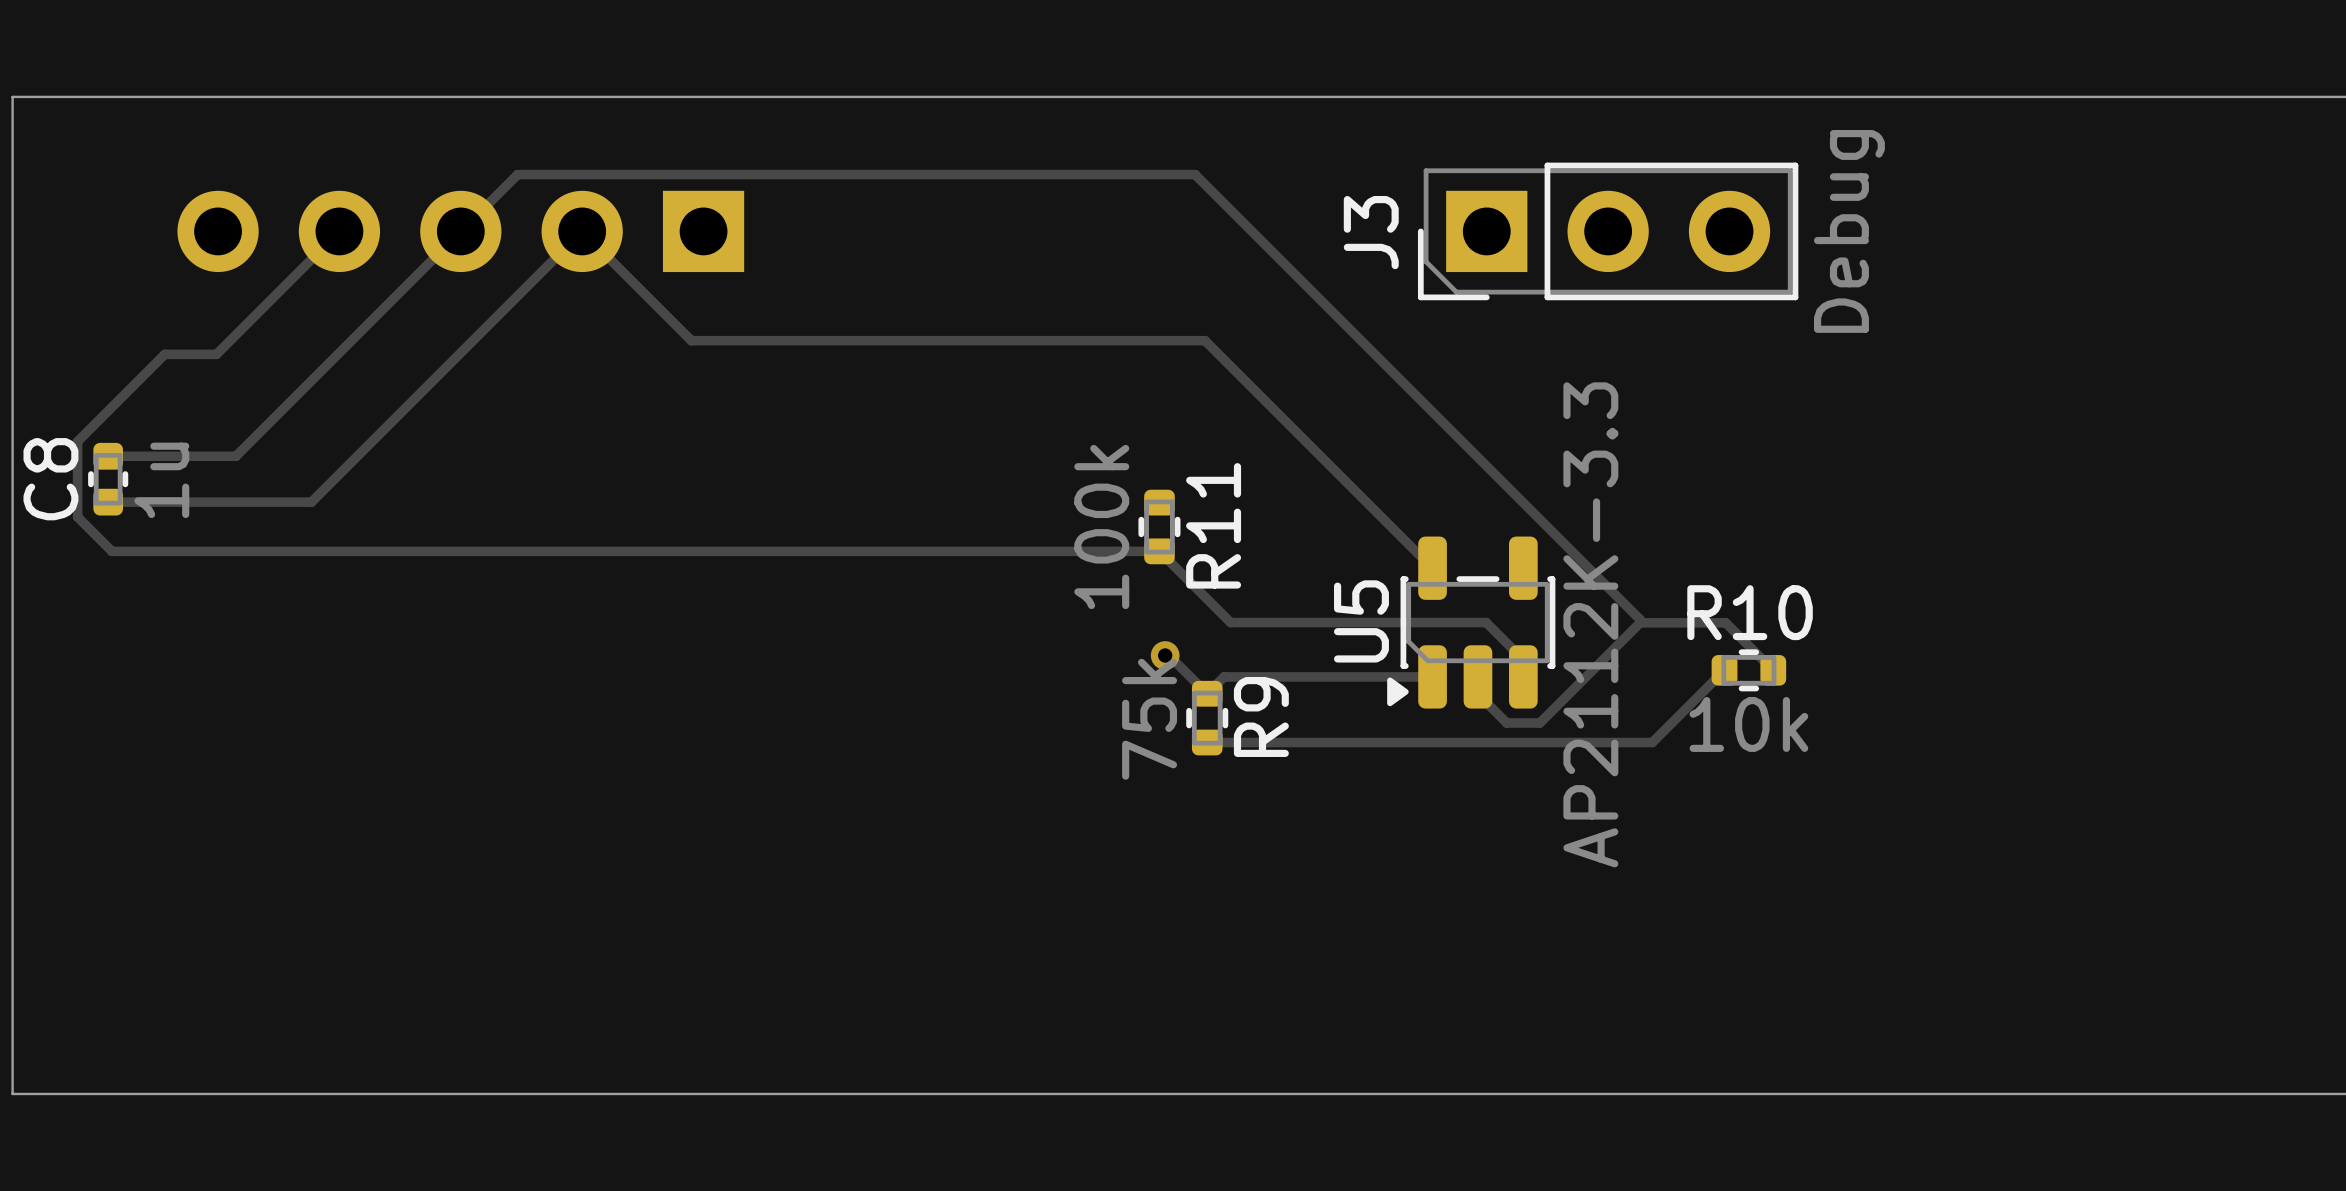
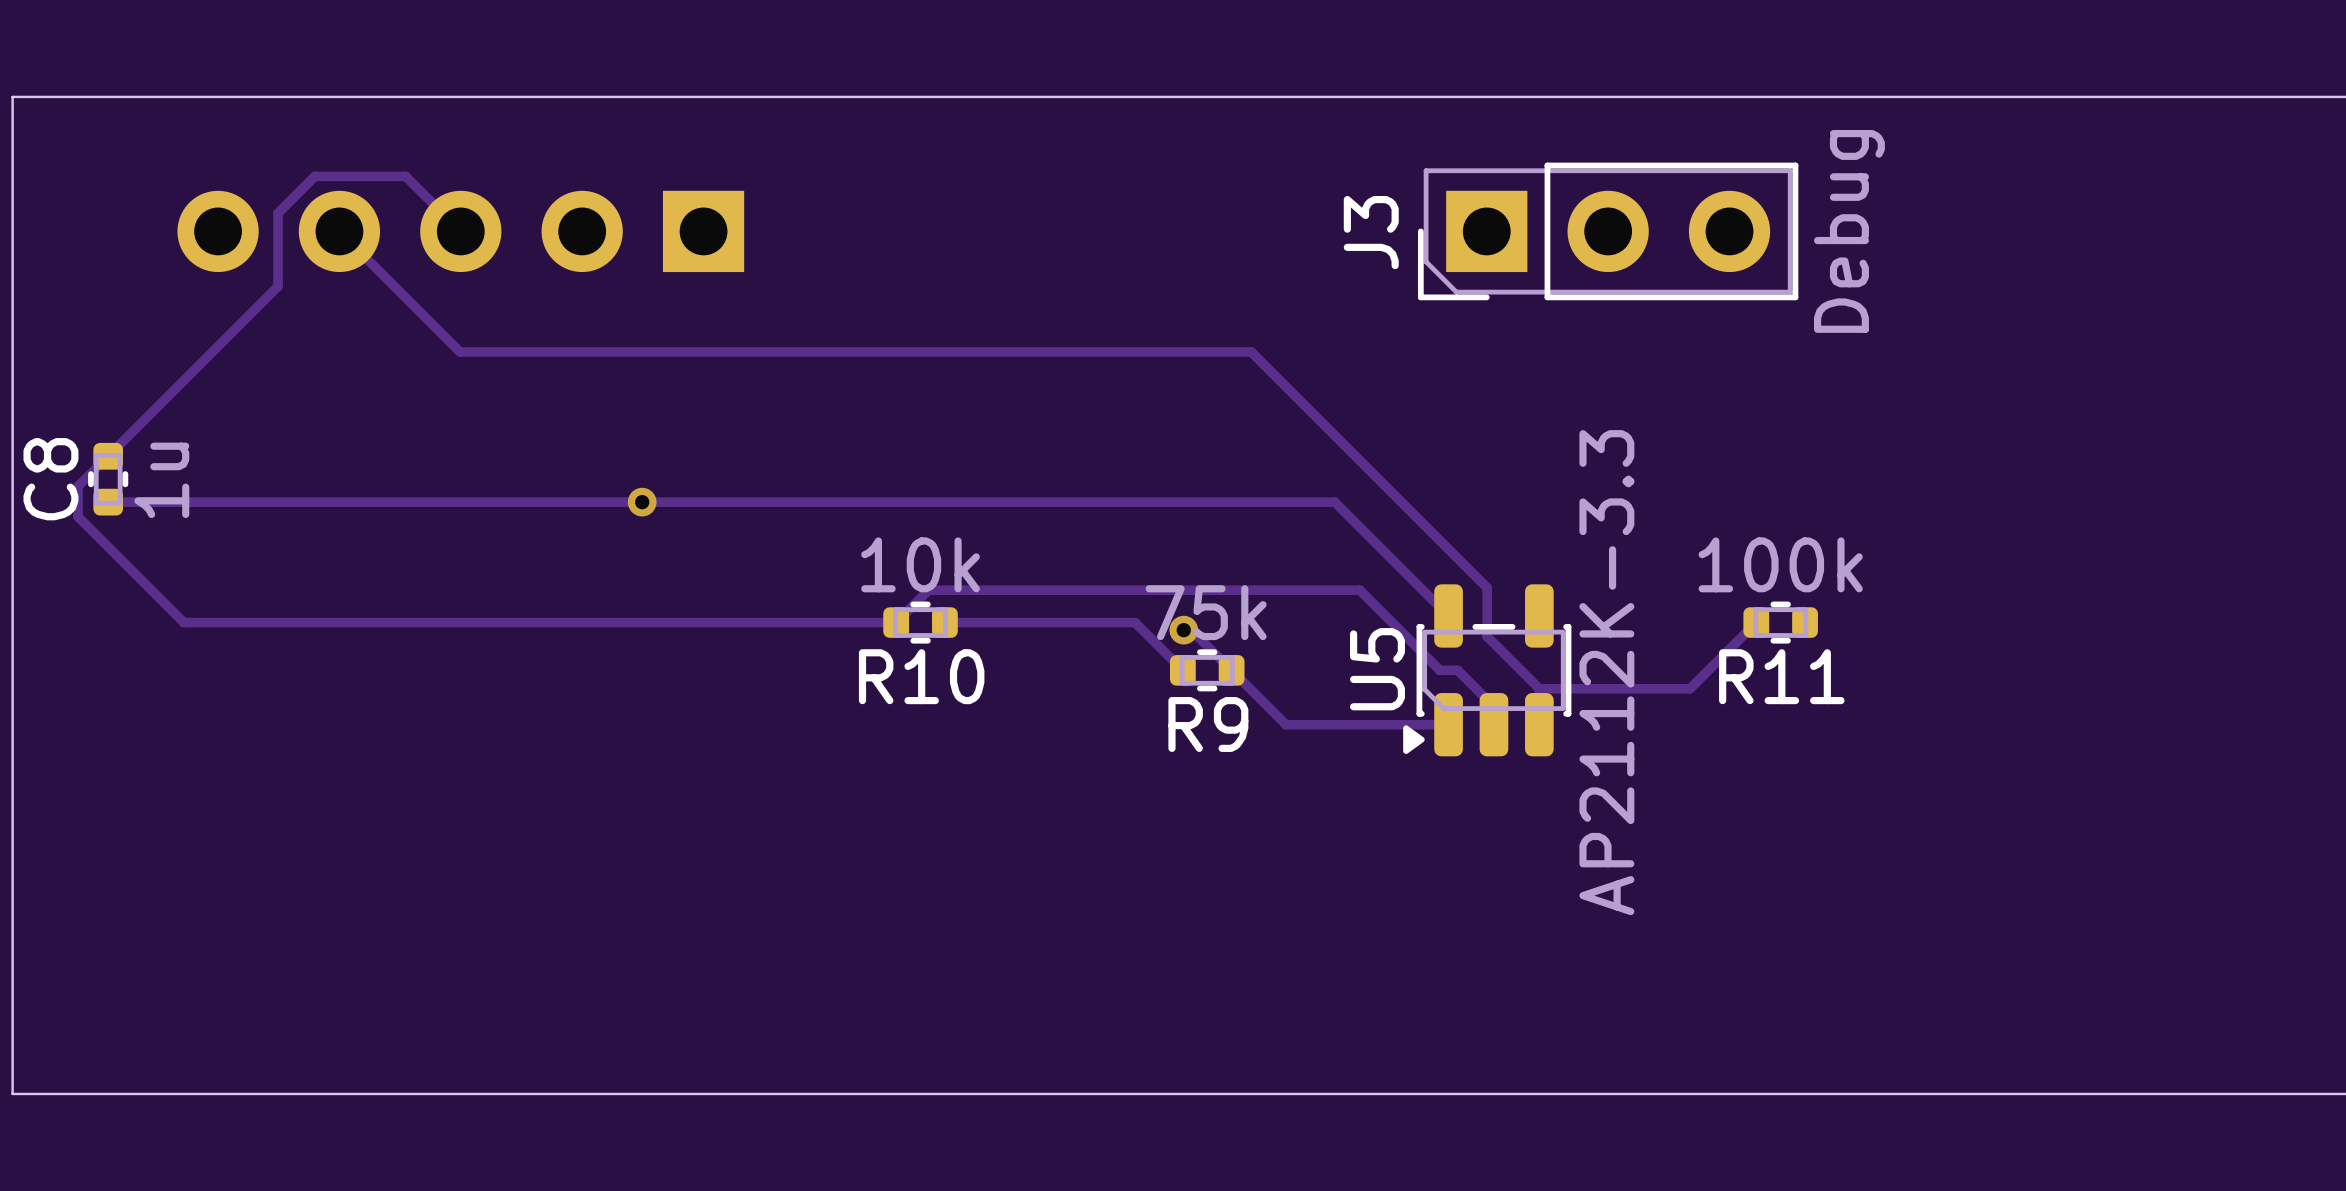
track: (339, 231) (216, 354) (164, 354) (77, 441) (77, 517) (111, 551) (1159, 551) (1230, 622) (1486, 622) (1523, 659) (1523, 676) -> (339, 231) (459, 351) (1251, 351) (1487, 587) (1487, 636) (1539, 688)
track: none -> (460, 231) (405, 176) (314, 176) (278, 213) (278, 286) (78, 486) (78, 516) (183, 622) (896, 622) (928, 590) (1359, 590) (1439, 670) (1457, 670) (1493, 706) (1493, 724)
track: (108, 456) (235, 456) (517, 174) (1195, 174) (1640, 619) (1640, 622) -> none
track: (311, 502) (582, 231) (691, 340) (1205, 340) (1432, 568) -> (311, 502) (1334, 502) (1448, 615)
via: none -> (642, 502)
R11 rotation: 0° (1159, 526) -> 90° clockwise (1780, 622)
R11 position: (1159, 526) -> (1780, 622)
R10 name position: R10 (1750, 612) -> R10 (921, 676)
track: none -> (944, 622) (1135, 622) (1182, 670)
U5 position: (1471, 622) -> (1487, 670)
track: (1640, 622) (1725, 622) (1773, 670) -> none
track: (1640, 622) (1539, 723) (1506, 723) (1477, 694) (1477, 676) -> none
track: none -> (1756, 622) (1690, 688) (1539, 688)
track: none -> (1183, 630) (1191, 630) (1285, 724) (1448, 724)
track: (1165, 655) (1168, 655) (1207, 693) (1224, 676) (1432, 676) -> none
via position: (1165, 655) -> (1183, 630)
track: (1724, 670) (1652, 742) (1207, 742) -> none
R10 position: (1748, 670) -> (920, 622)
R9 rotation: 0° (1207, 718) -> 90° clockwise (1207, 670)
R9 position: (1207, 718) -> (1207, 670)
R10 value position: 10k (1748, 724) -> 10k (920, 564)

